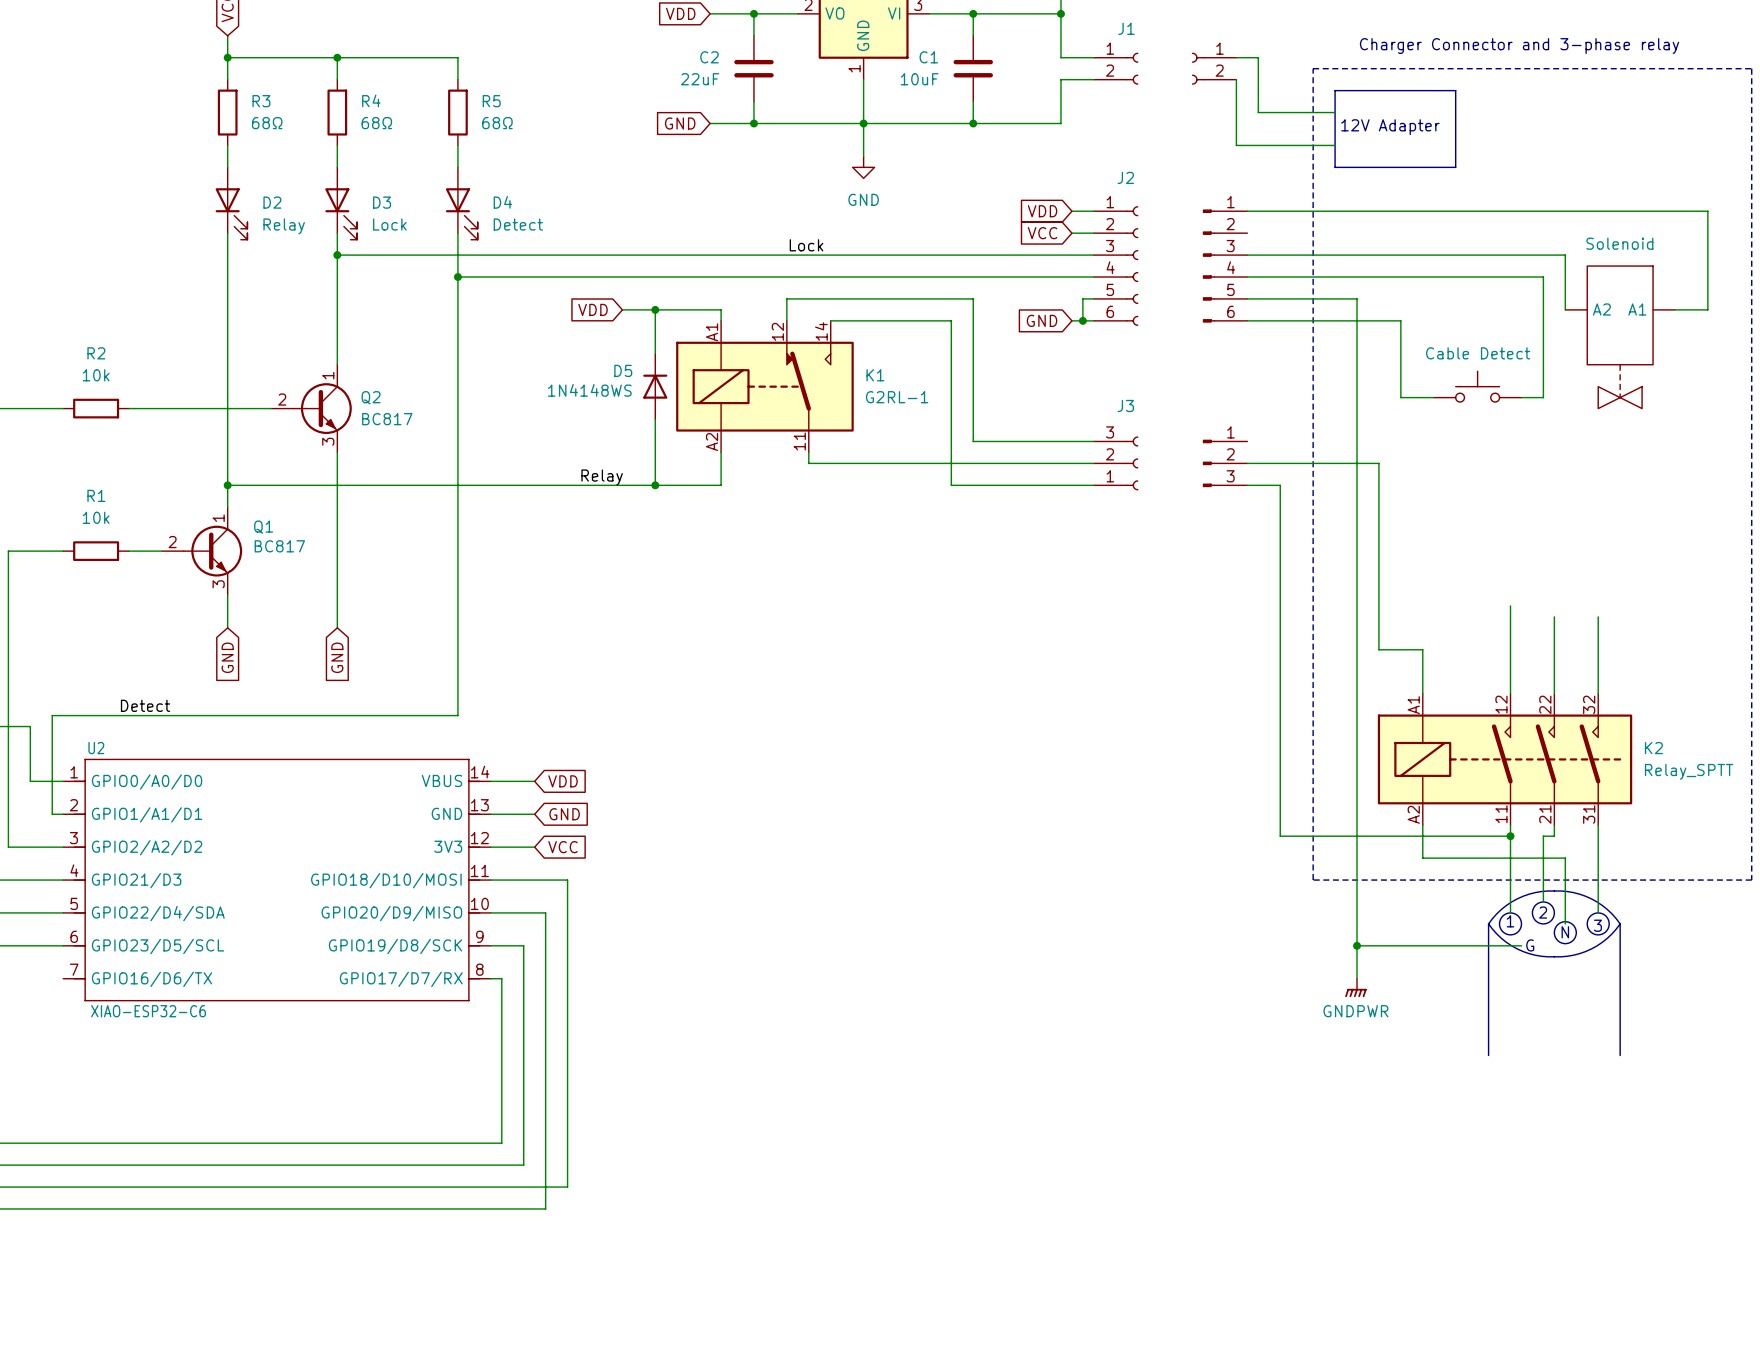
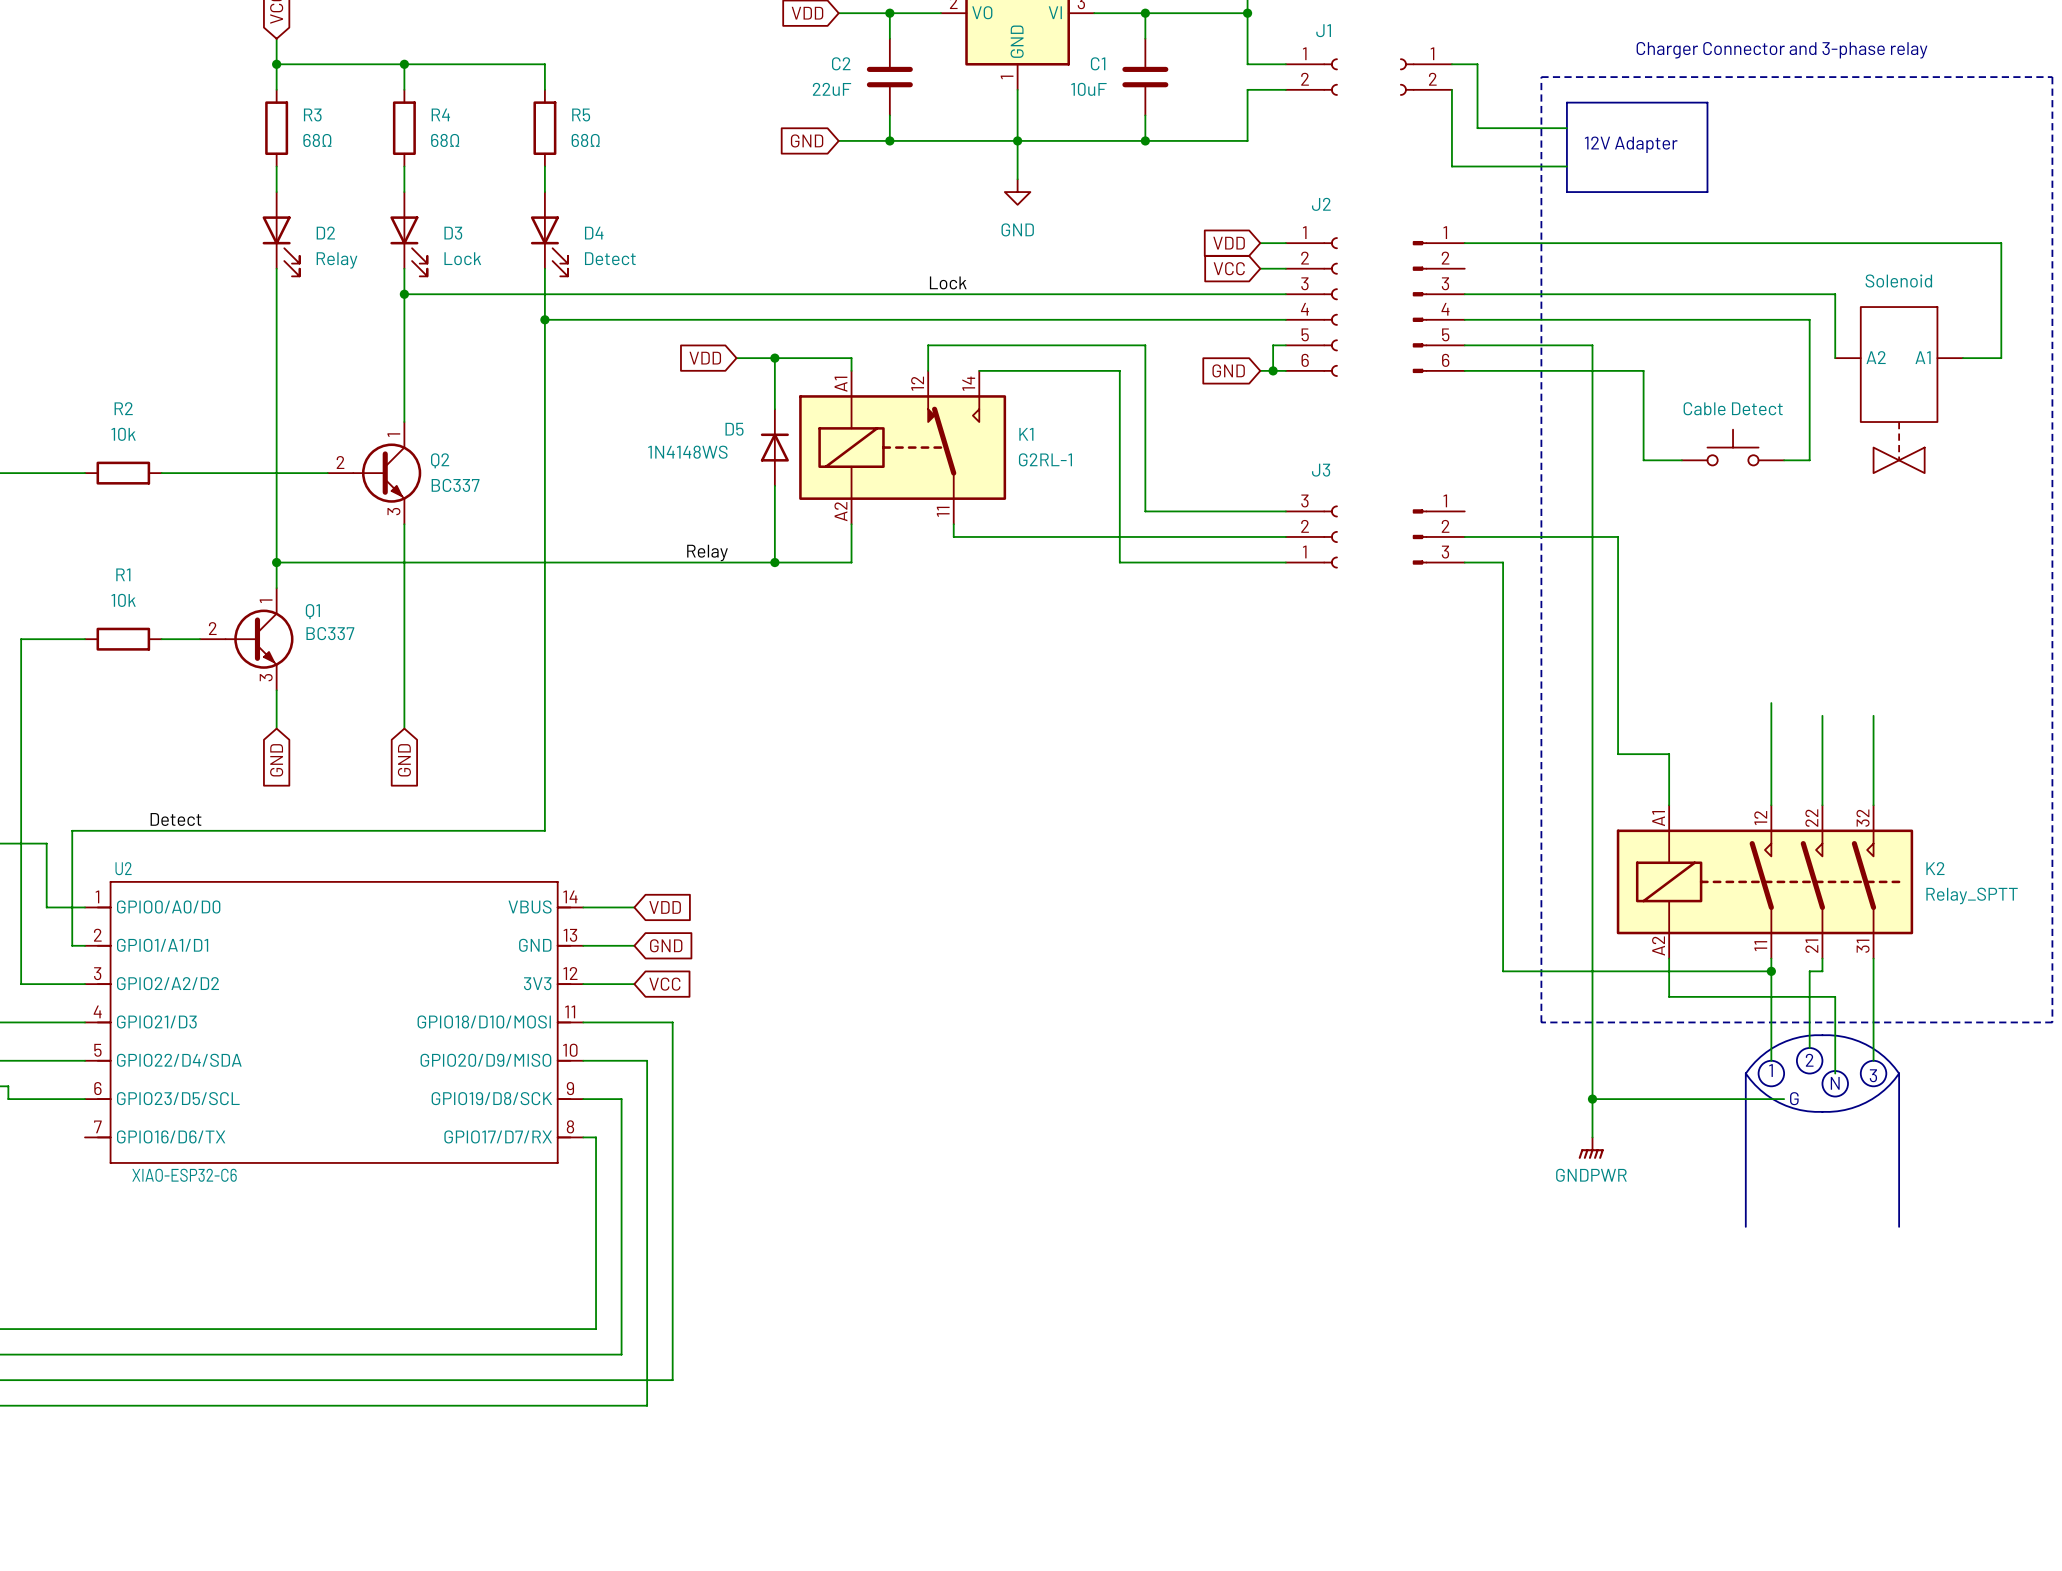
Q2 value: BC817 (387, 419) -> BC337 (455, 485)
Q1 value: BC817 (279, 546) -> BC337 (330, 633)

